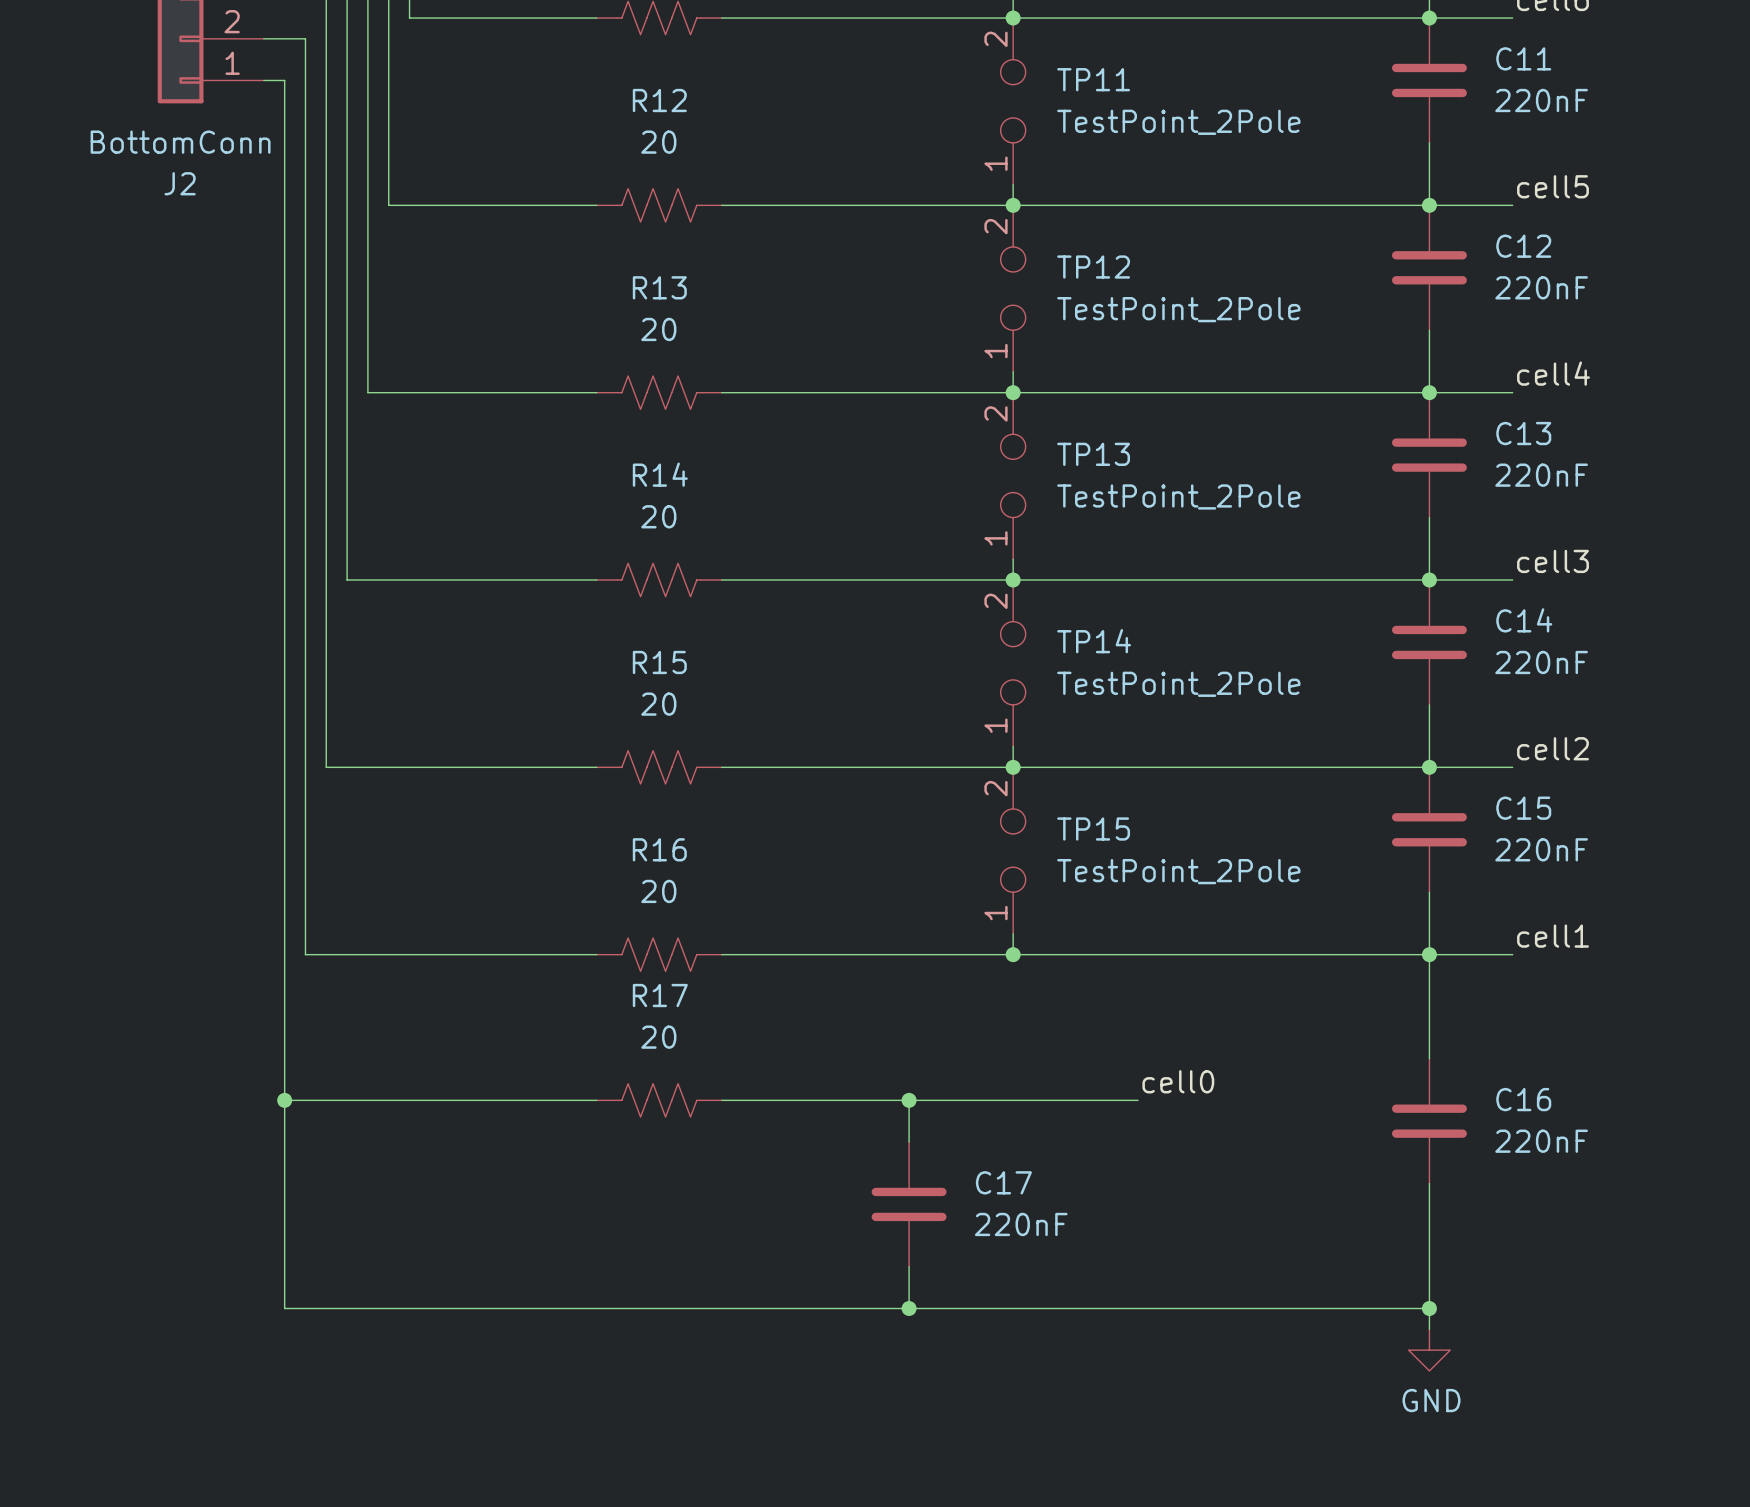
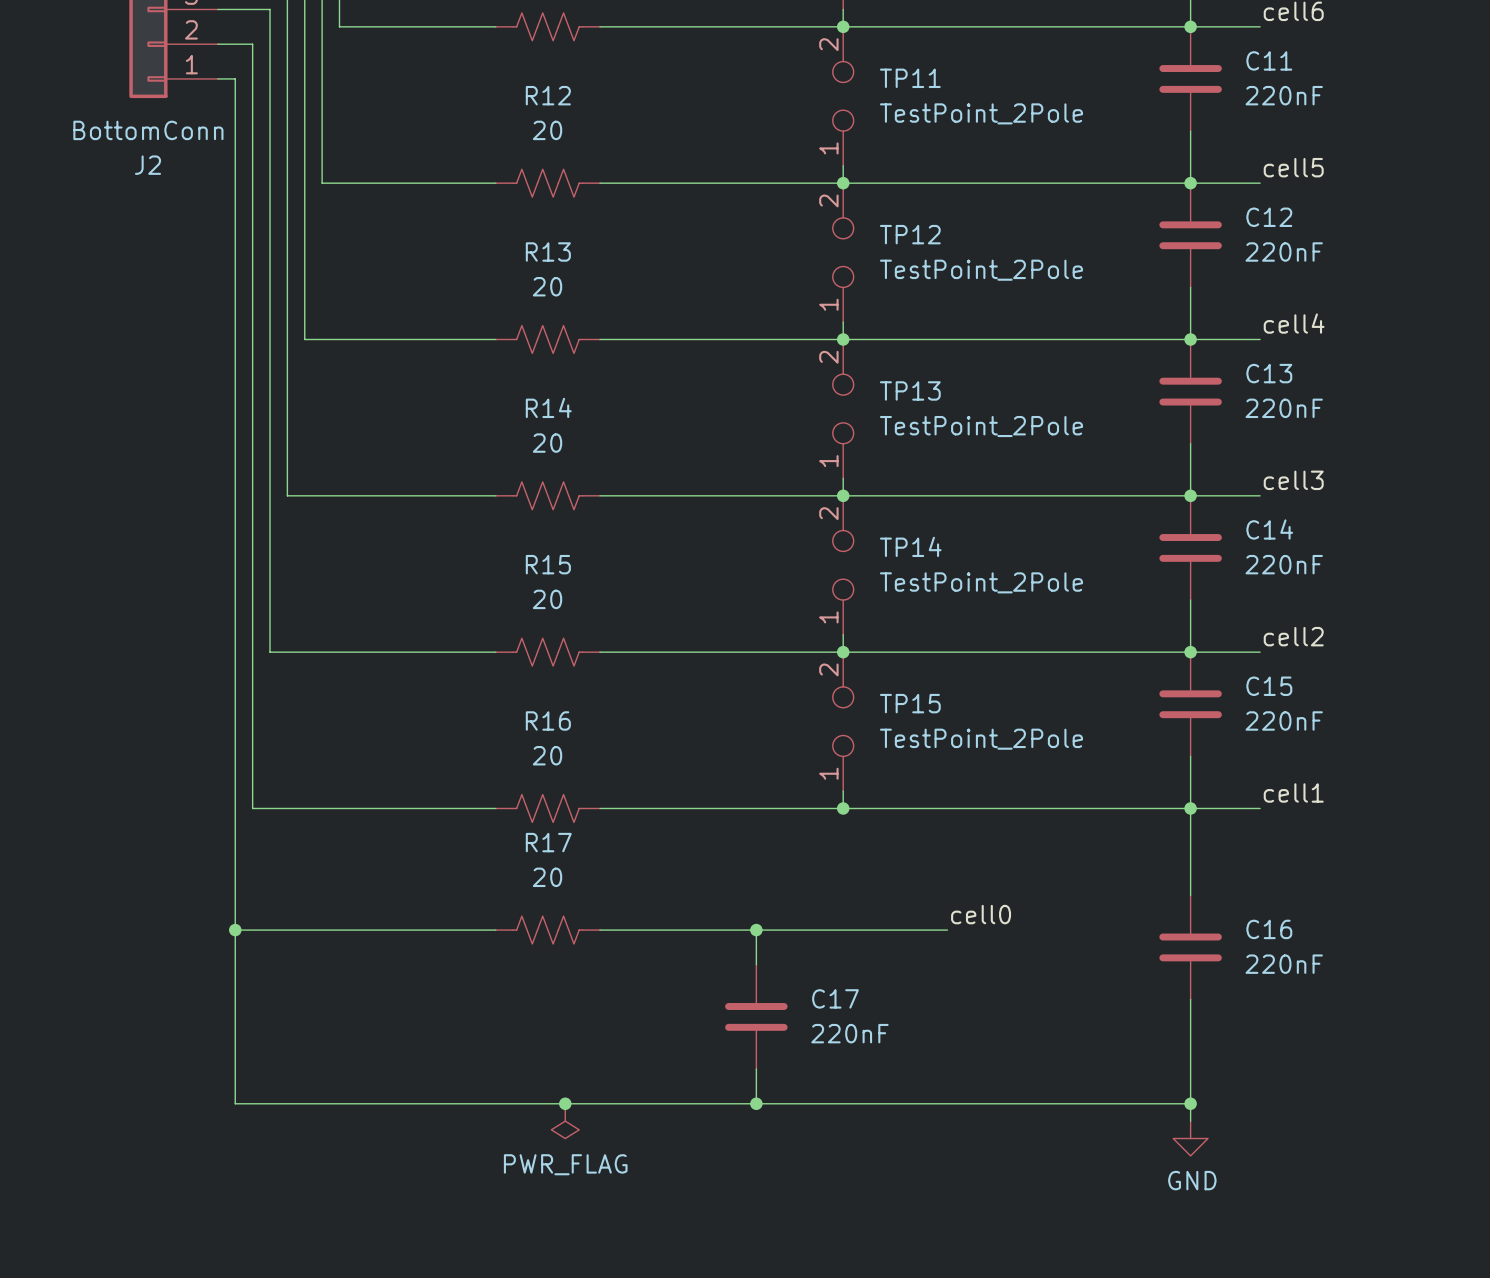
junction: none -> (565, 1103)
power symbol: none -> PWR_FLAG (565, 1121)

